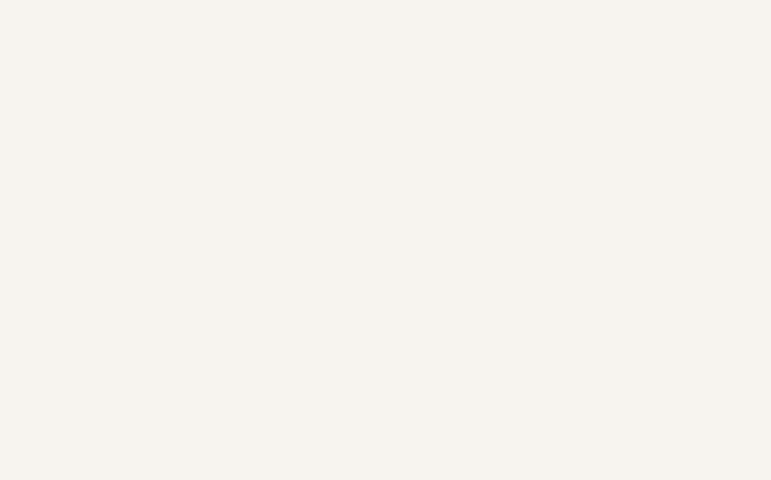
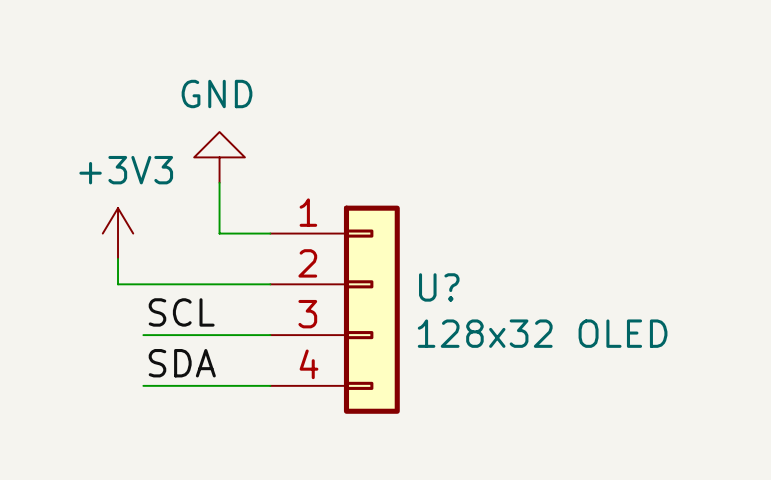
power symbol: none -> GND (219, 157)
wire: none -> (219, 182) (219, 233) (270, 233)
power symbol: none -> +3V3 (118, 233)
wire: none -> (118, 258) (118, 284) (270, 284)
U?: none -> 128x32 OLED (335, 309)
label: none -> SCL (181, 312)
wire: none -> (143, 335) (270, 335)
label: none -> SDA (182, 363)
wire: none -> (143, 385) (270, 385)

